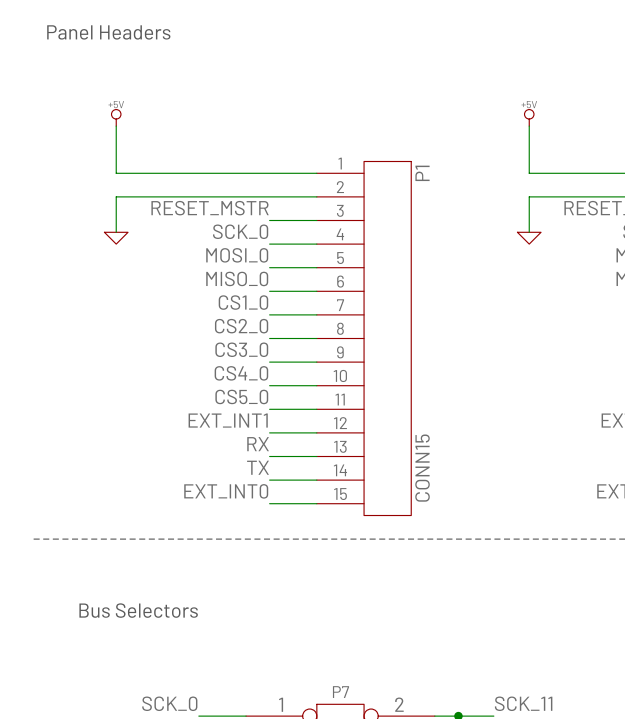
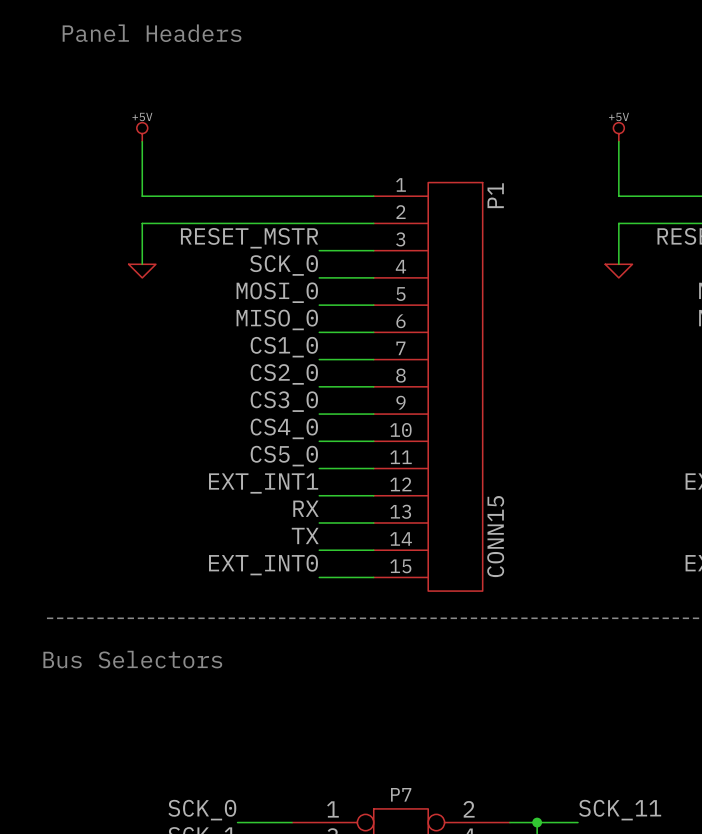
text position: Bus Selectors (138, 610) -> Bus Selectors (132, 659)

